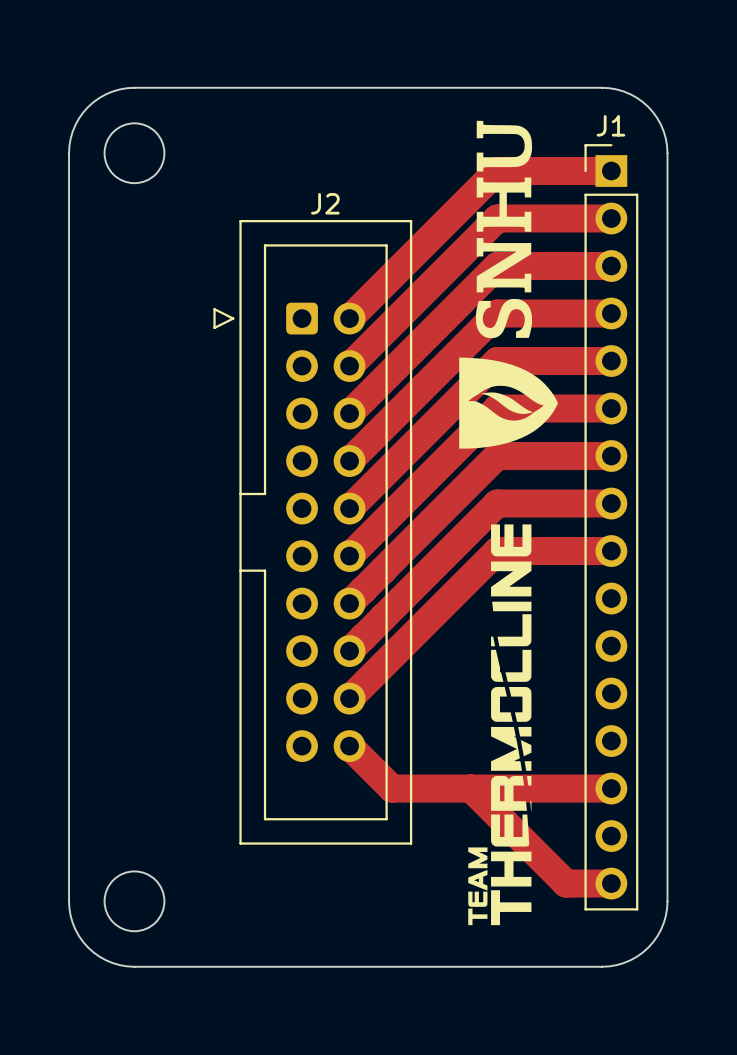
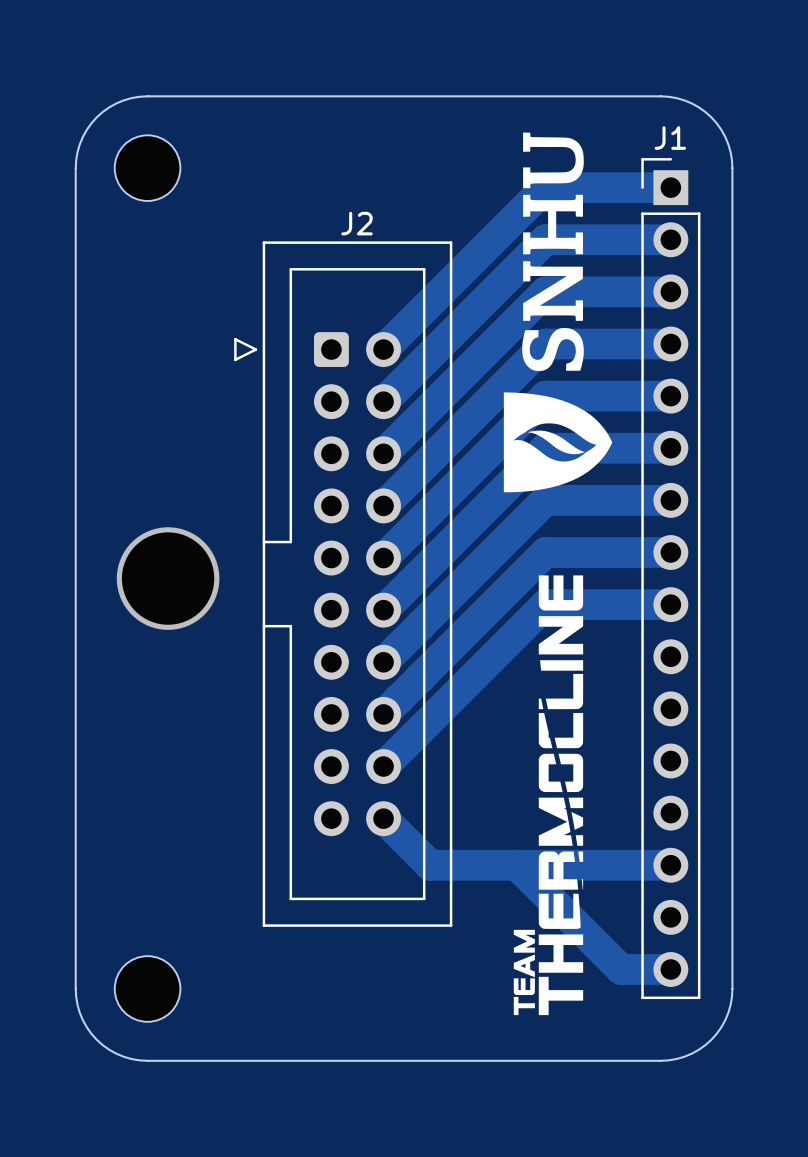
via: none -> (168, 578)

